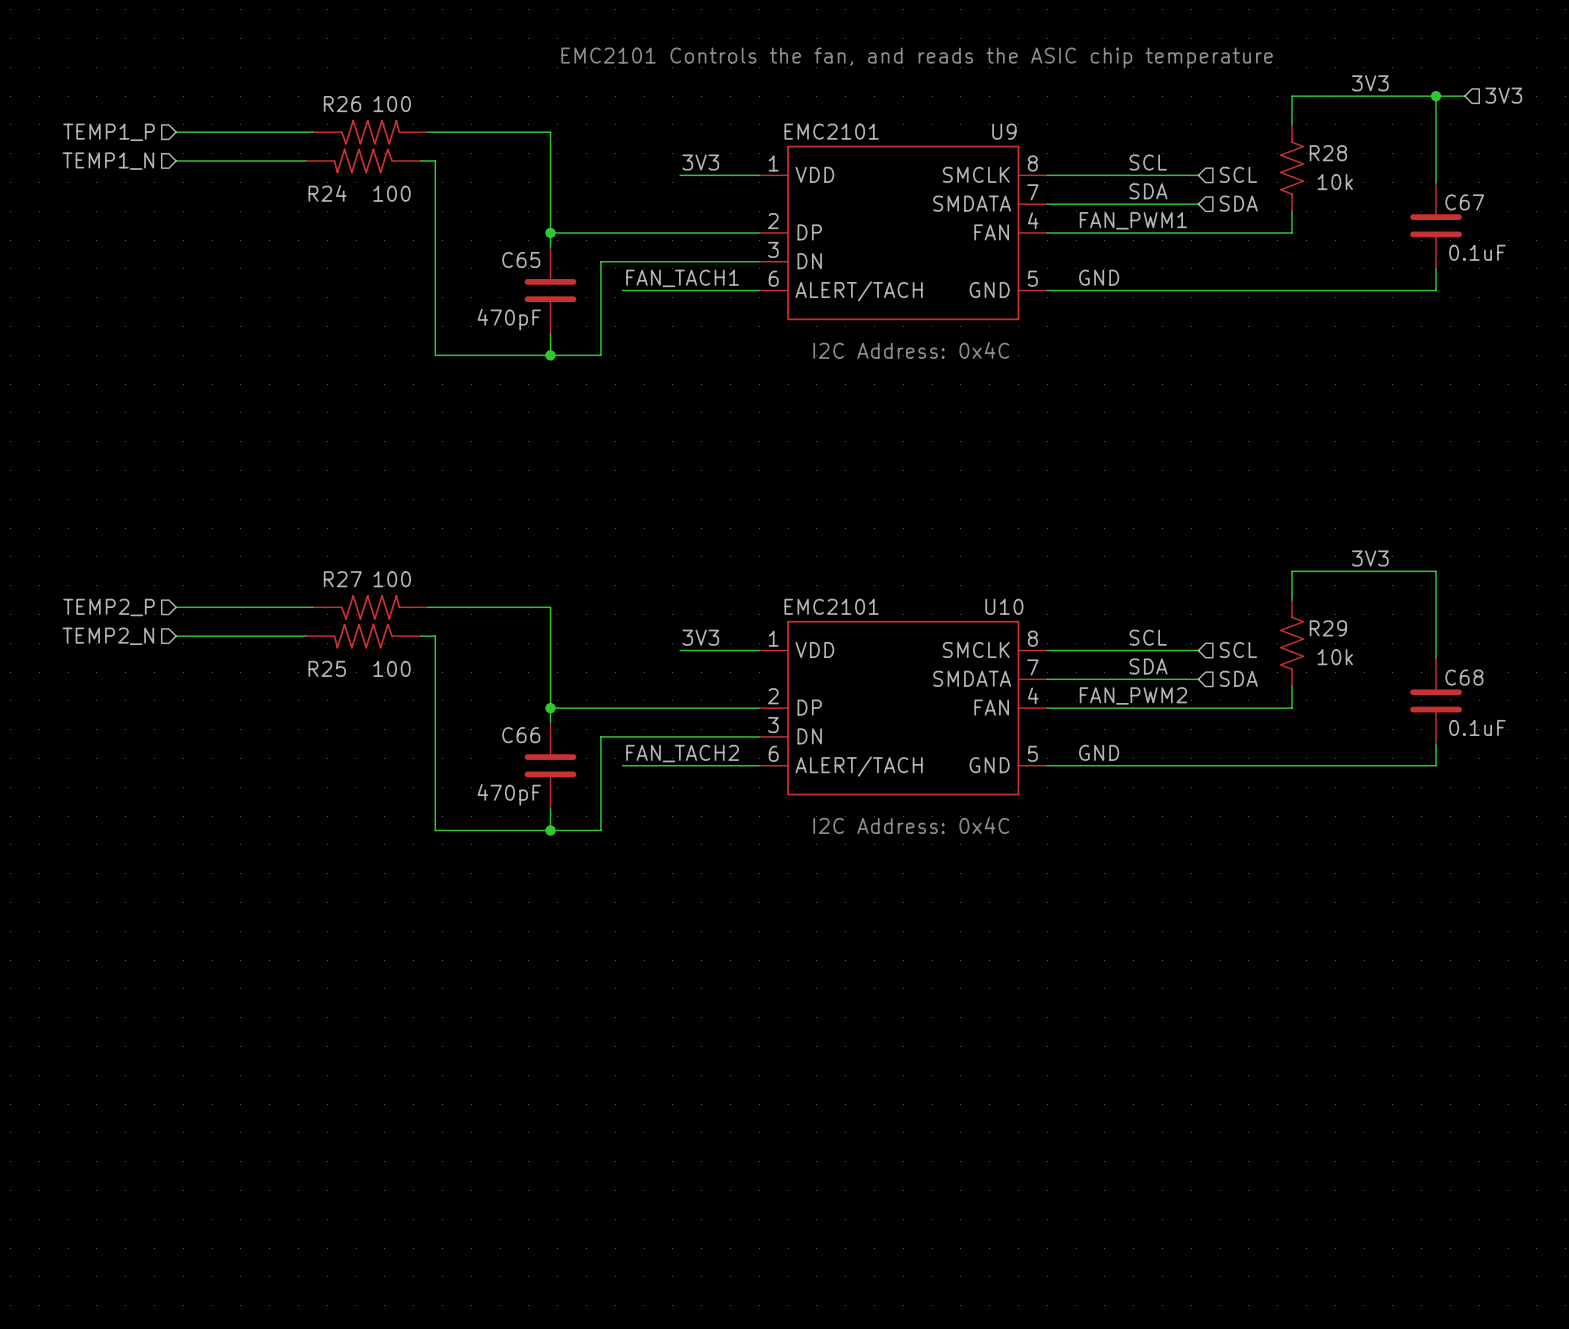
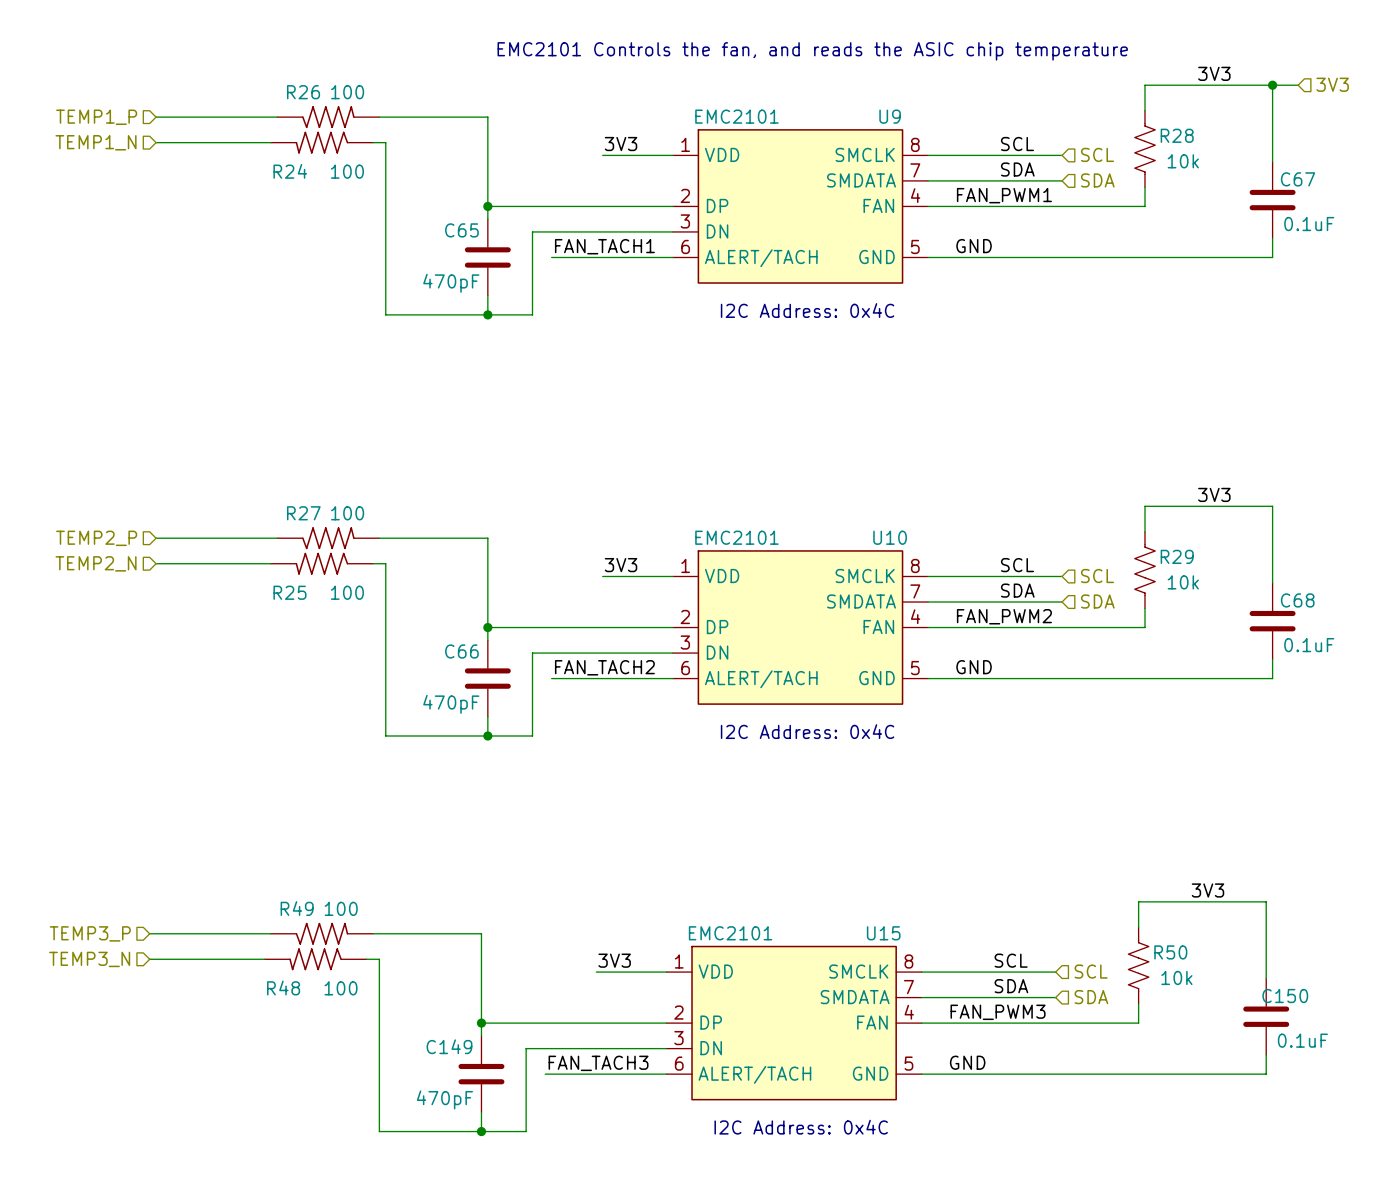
label: none -> 3V3 (1207, 890)
wire: none -> (1138, 927) (1138, 901) (1266, 901) (1266, 978)
hierarchical label: none -> TEMP3_P (90, 933)
wire: none -> (149, 933) (270, 933)
R49: none -> 100 (321, 933)
wire: none -> (373, 933) (481, 933) (481, 1035)
hierarchical label: none -> TEMP3_N (89, 959)
wire: none -> (149, 959) (264, 959)
R48: none -> 100 (315, 959)
wire: none -> (366, 959) (379, 959) (379, 1131) (526, 1131) (526, 1048) (666, 1048)
label: none -> 3V3 (614, 960)
label: none -> SCL (1011, 960)
R50: none -> 10k (1138, 965)
wire: none -> (596, 972) (666, 972)
wire: none -> (921, 972) (1055, 972)
hierarchical label: none -> SCL (1091, 971)
label: none -> SDA (1011, 986)
wire: none -> (921, 997) (1055, 997)
hierarchical label: none -> SDA (1091, 997)
wire: none -> (1138, 1003) (1138, 1023) (921, 1023)
label: none -> FAN_PWM3 (998, 1012)
C150: none -> 0.1uF (1266, 1016)
wire: none -> (481, 1023) (666, 1023)
junction: none -> (481, 1023)
U15: none -> EMC2101 (794, 1023)
wire: none -> (1266, 1054) (1266, 1074) (921, 1074)
label: none -> FAN_TACH3 (598, 1063)
label: none -> GND (967, 1062)
C149: none -> 470pF (481, 1074)
wire: none -> (545, 1074) (666, 1074)
wire: none -> (481, 1112) (481, 1131)
text: none -> I2C Address: 0x4C (801, 1127)
junction: none -> (481, 1131)

